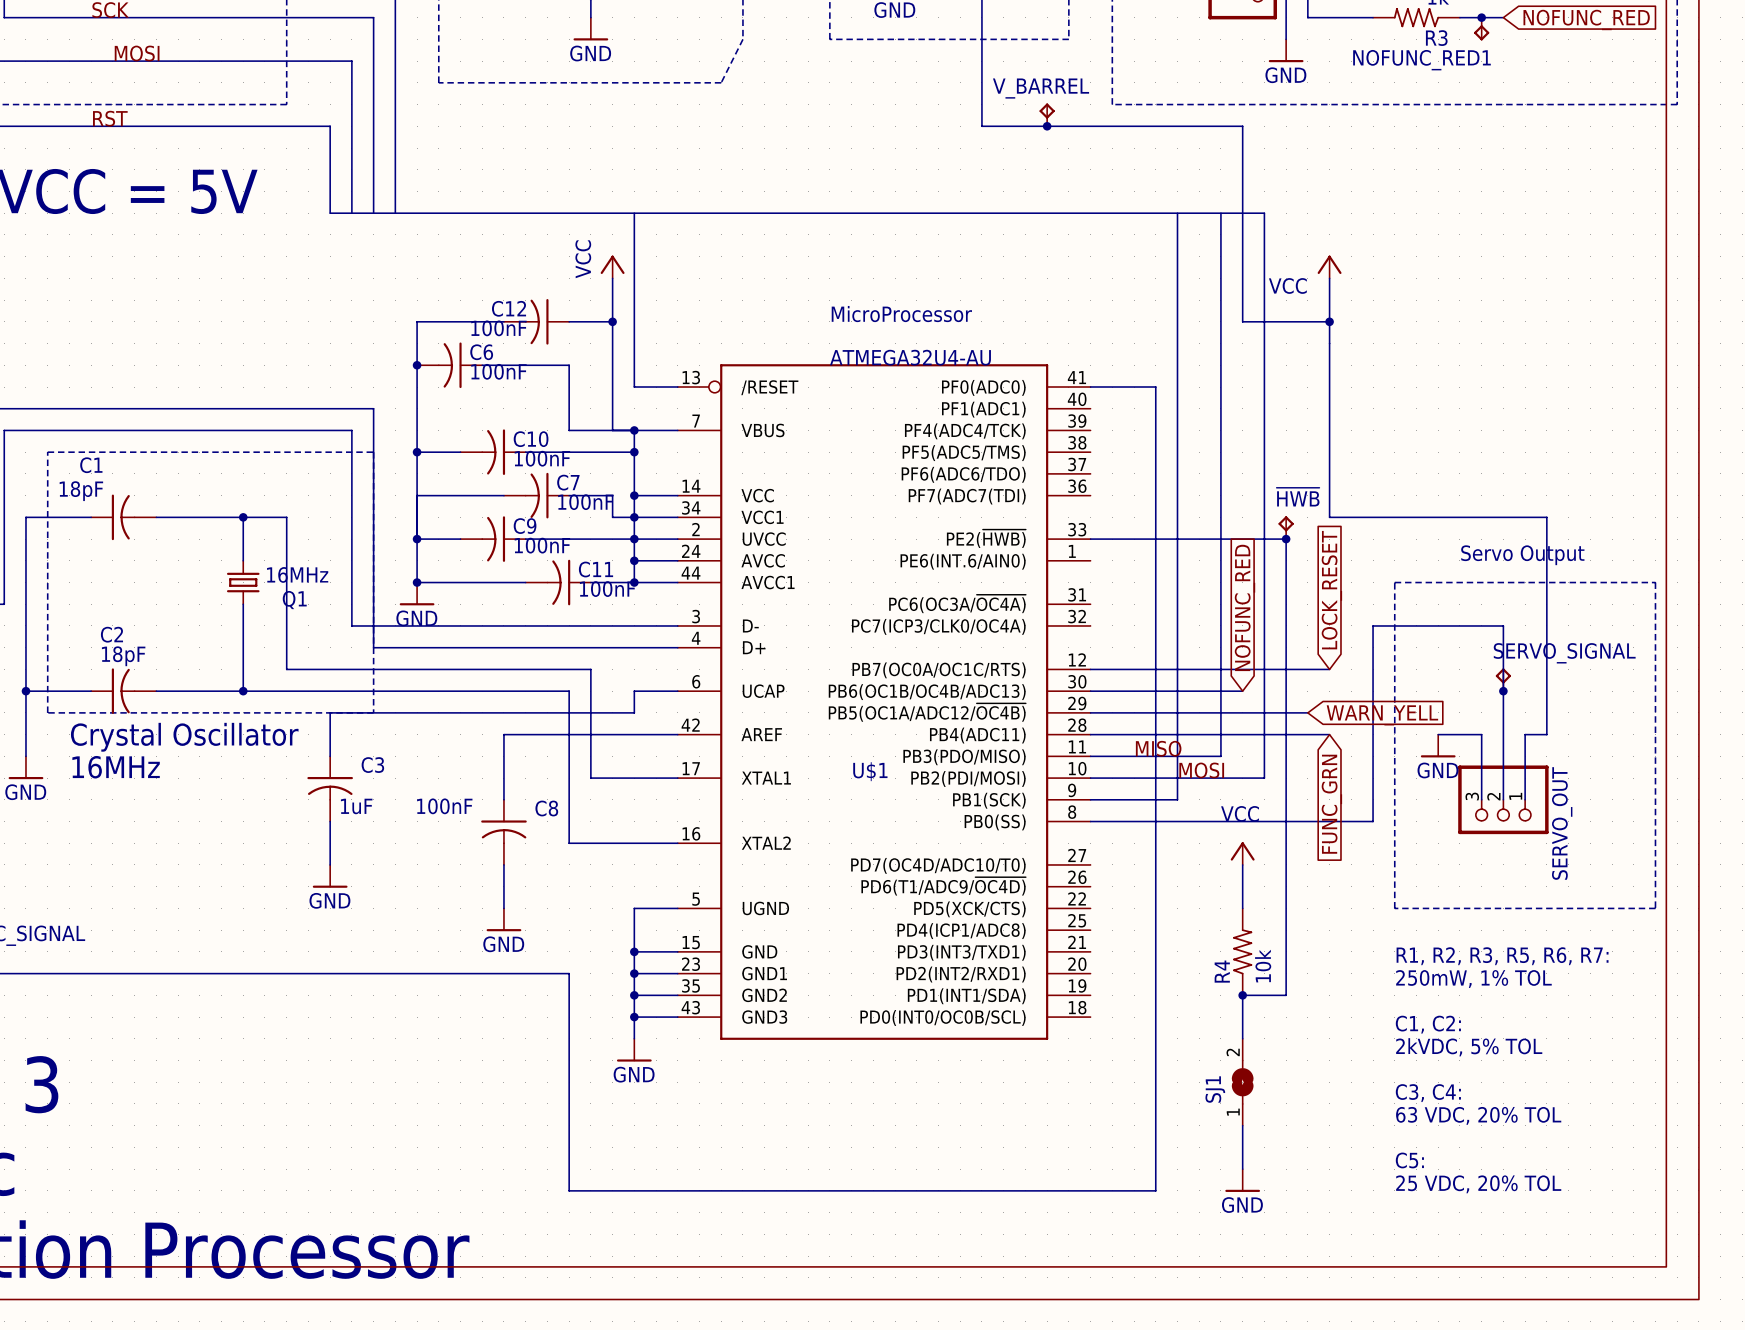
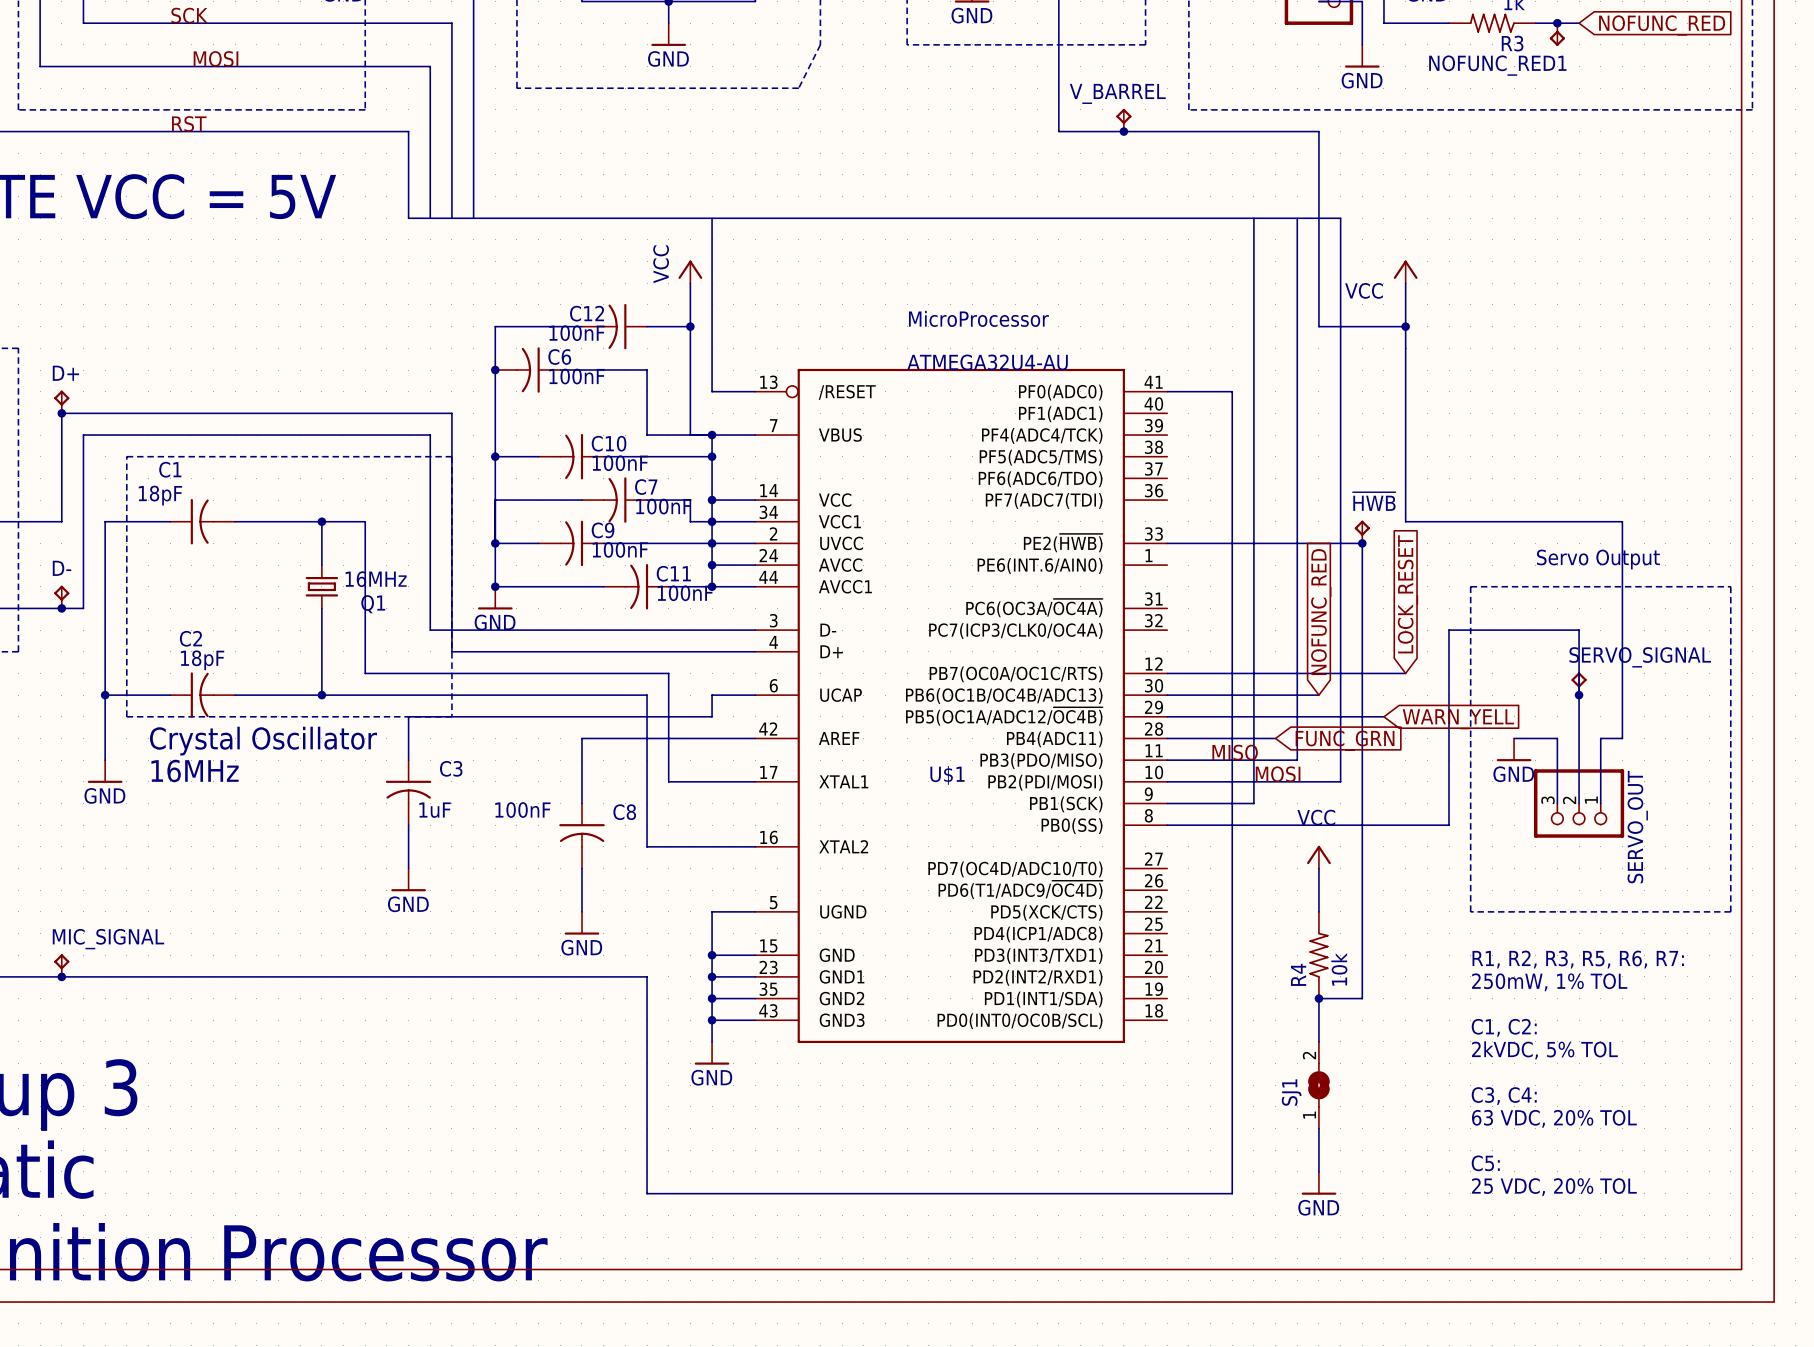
wire: (1199, 734) (1329, 734) -> none
global label rotation: 0° (1331, 804) -> 90° counterclockwise (1345, 740)

